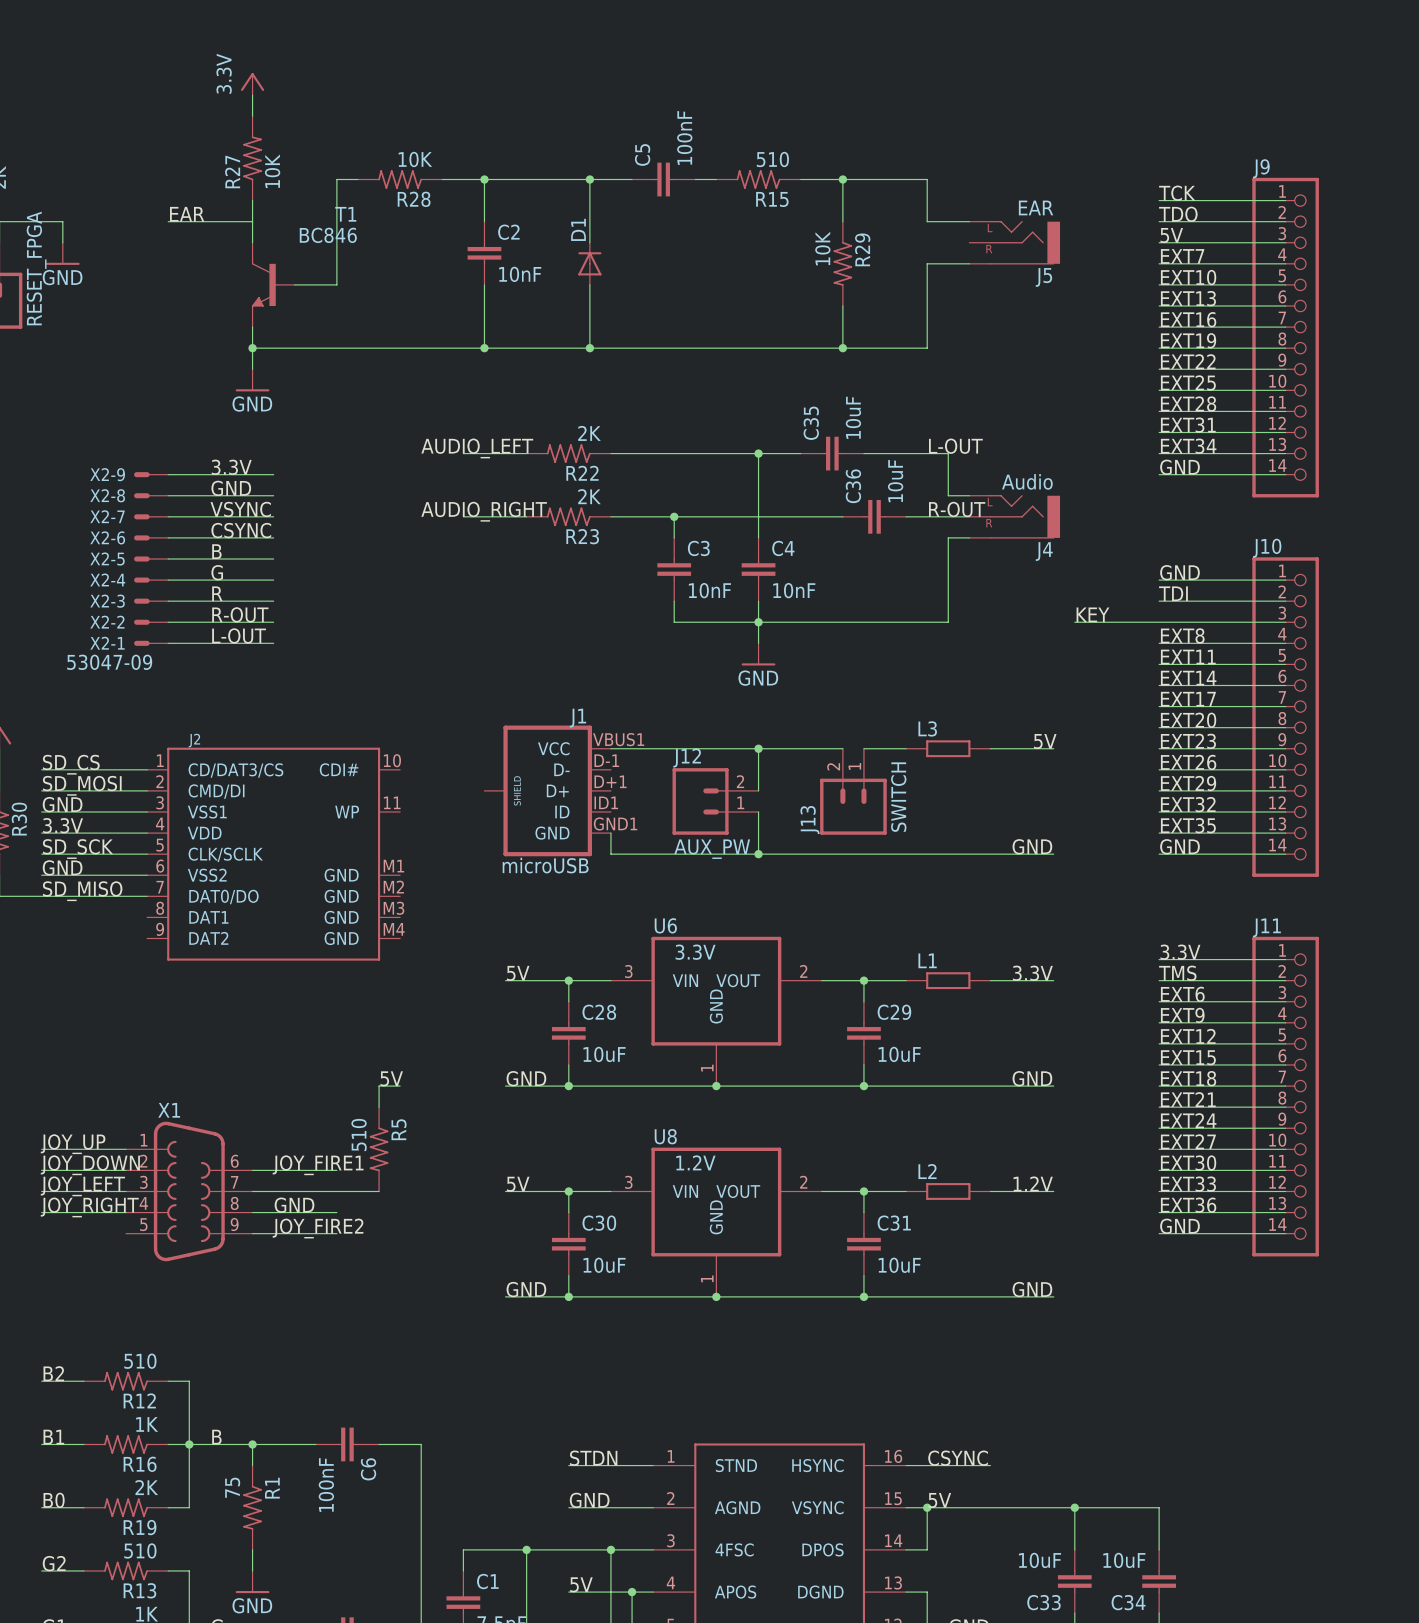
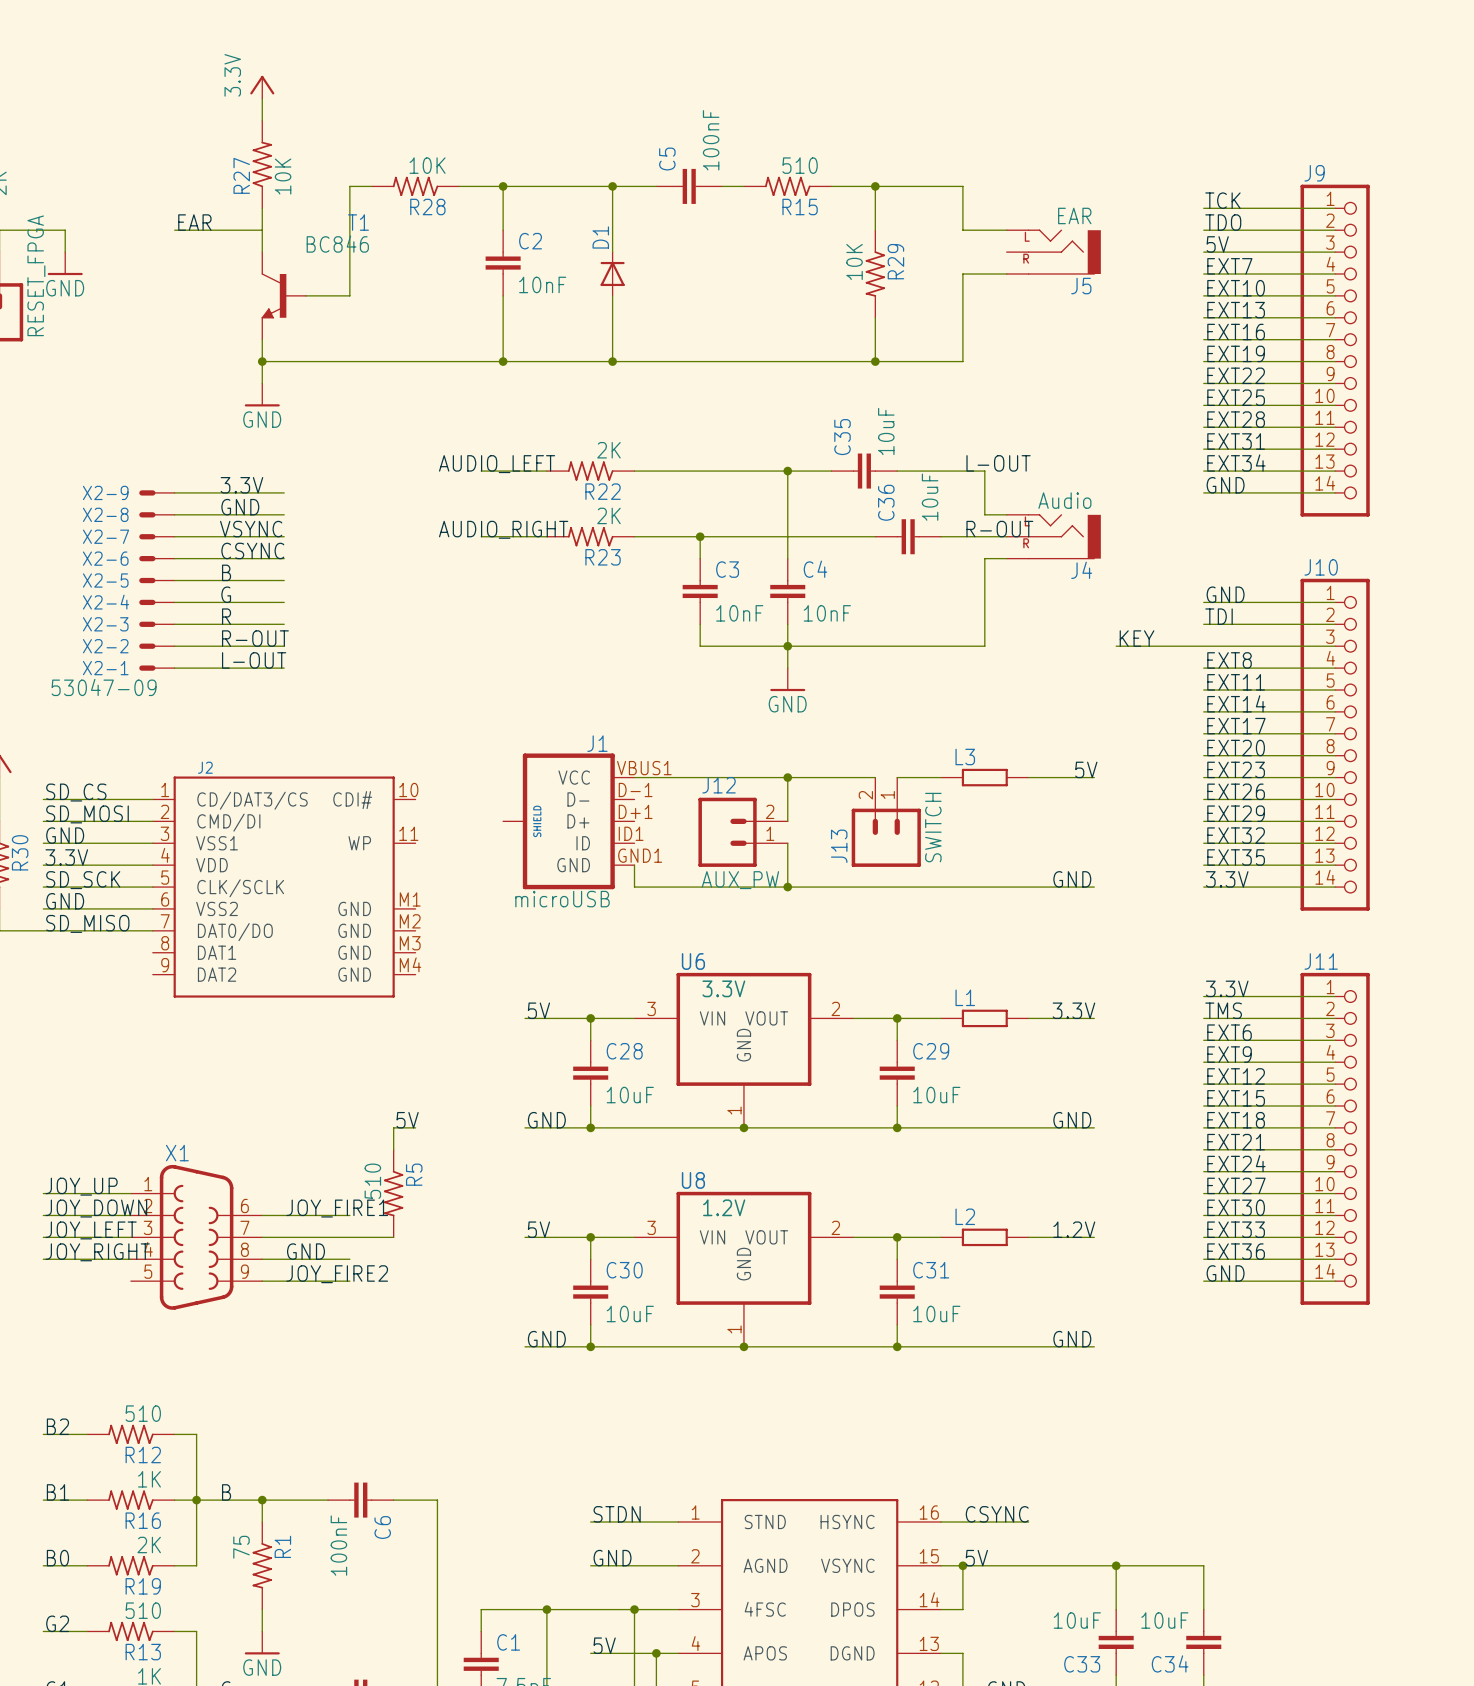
label: GND (1179, 846) -> 3.3V (1227, 879)

